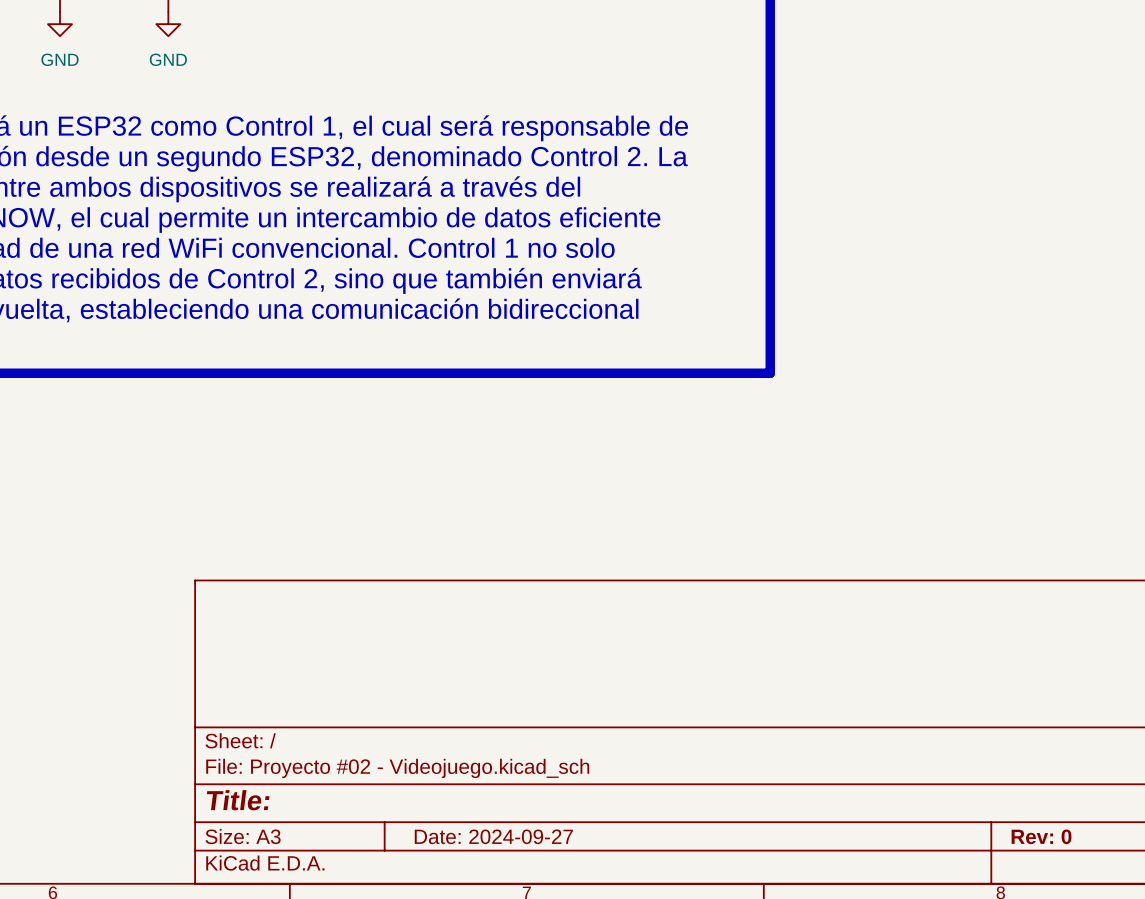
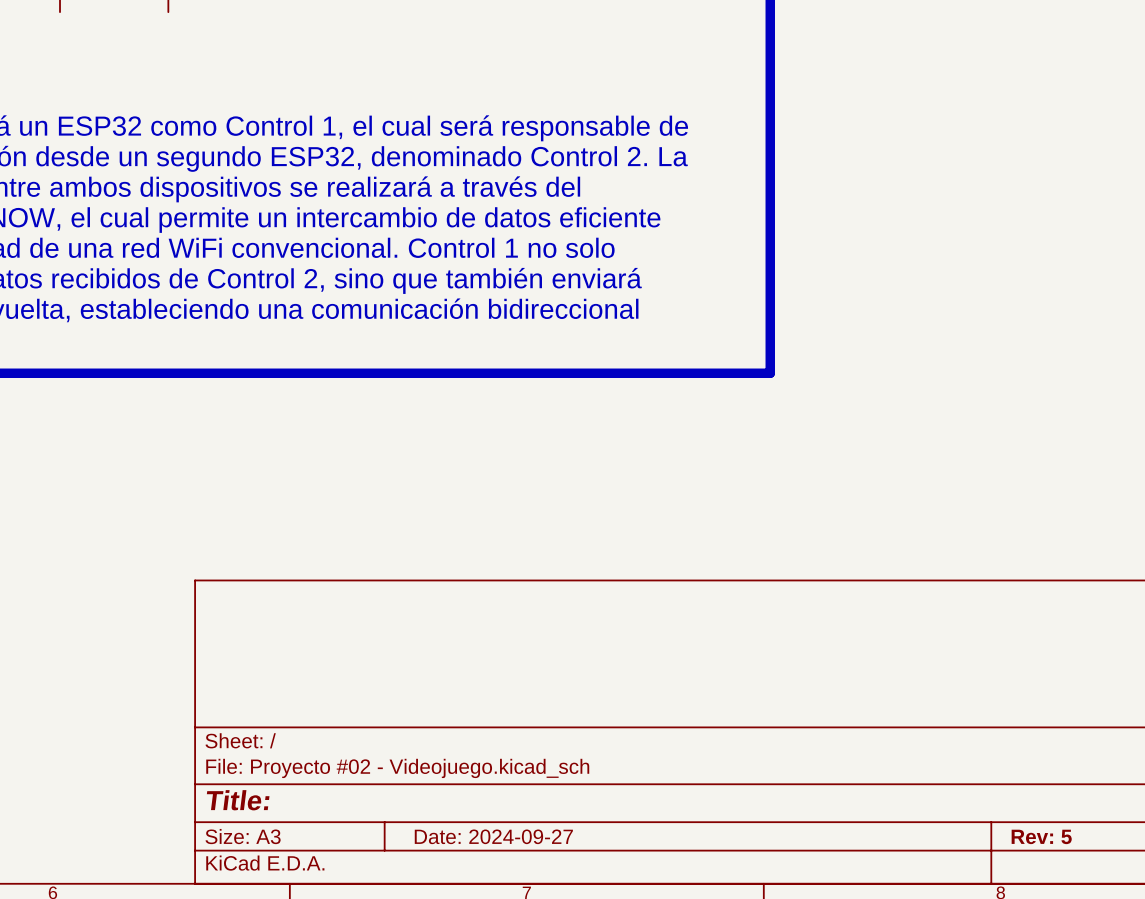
power symbol: GND (60, 24) -> none
power symbol: GND (168, 24) -> none
title block: Rev: 0 (1041, 836) -> Rev: 5 (1041, 836)

